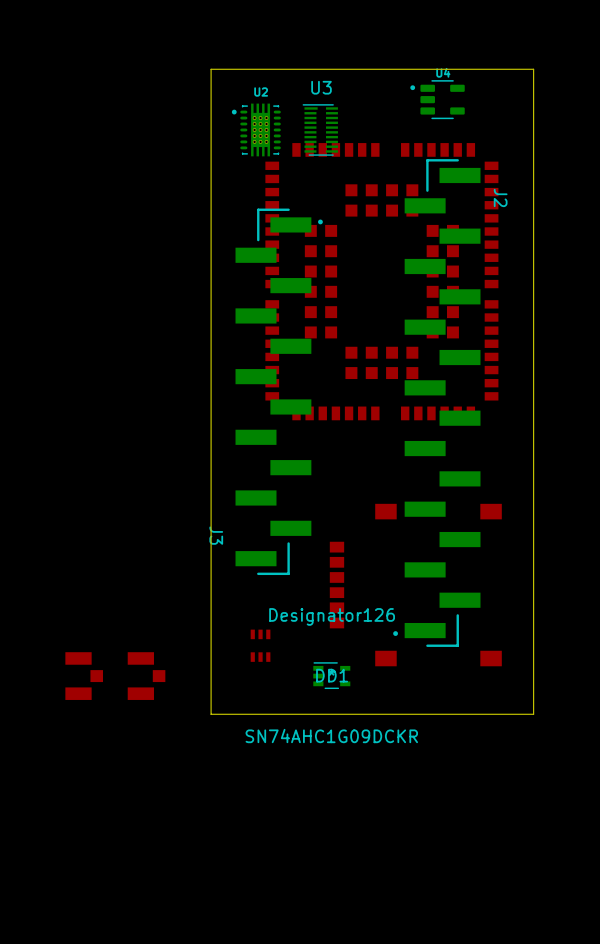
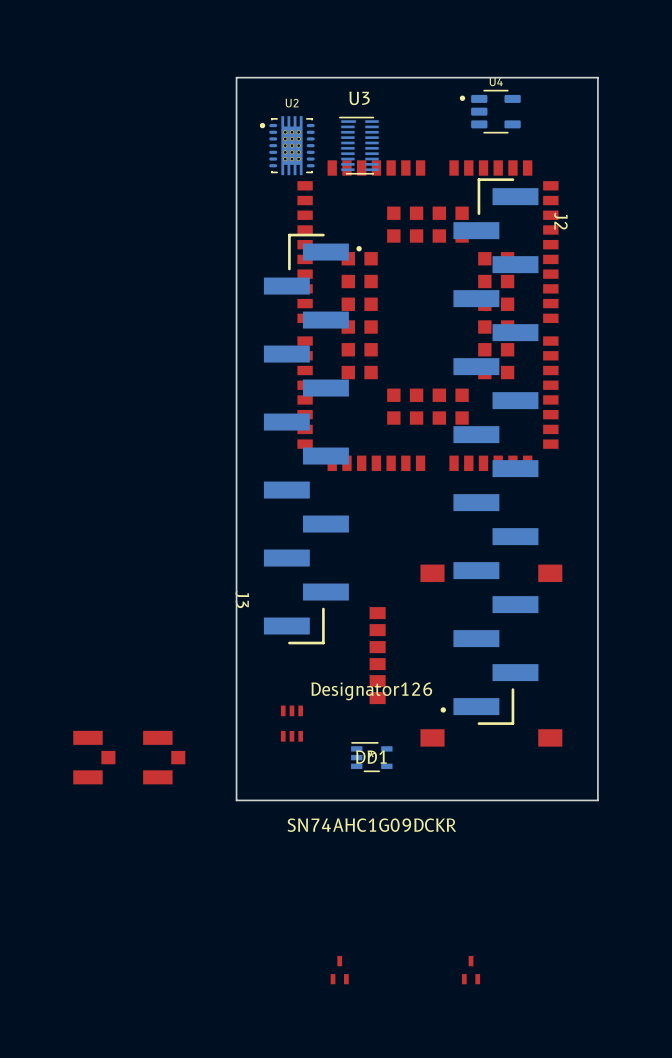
part: none -> (339, 970)
part: none -> (471, 970)

